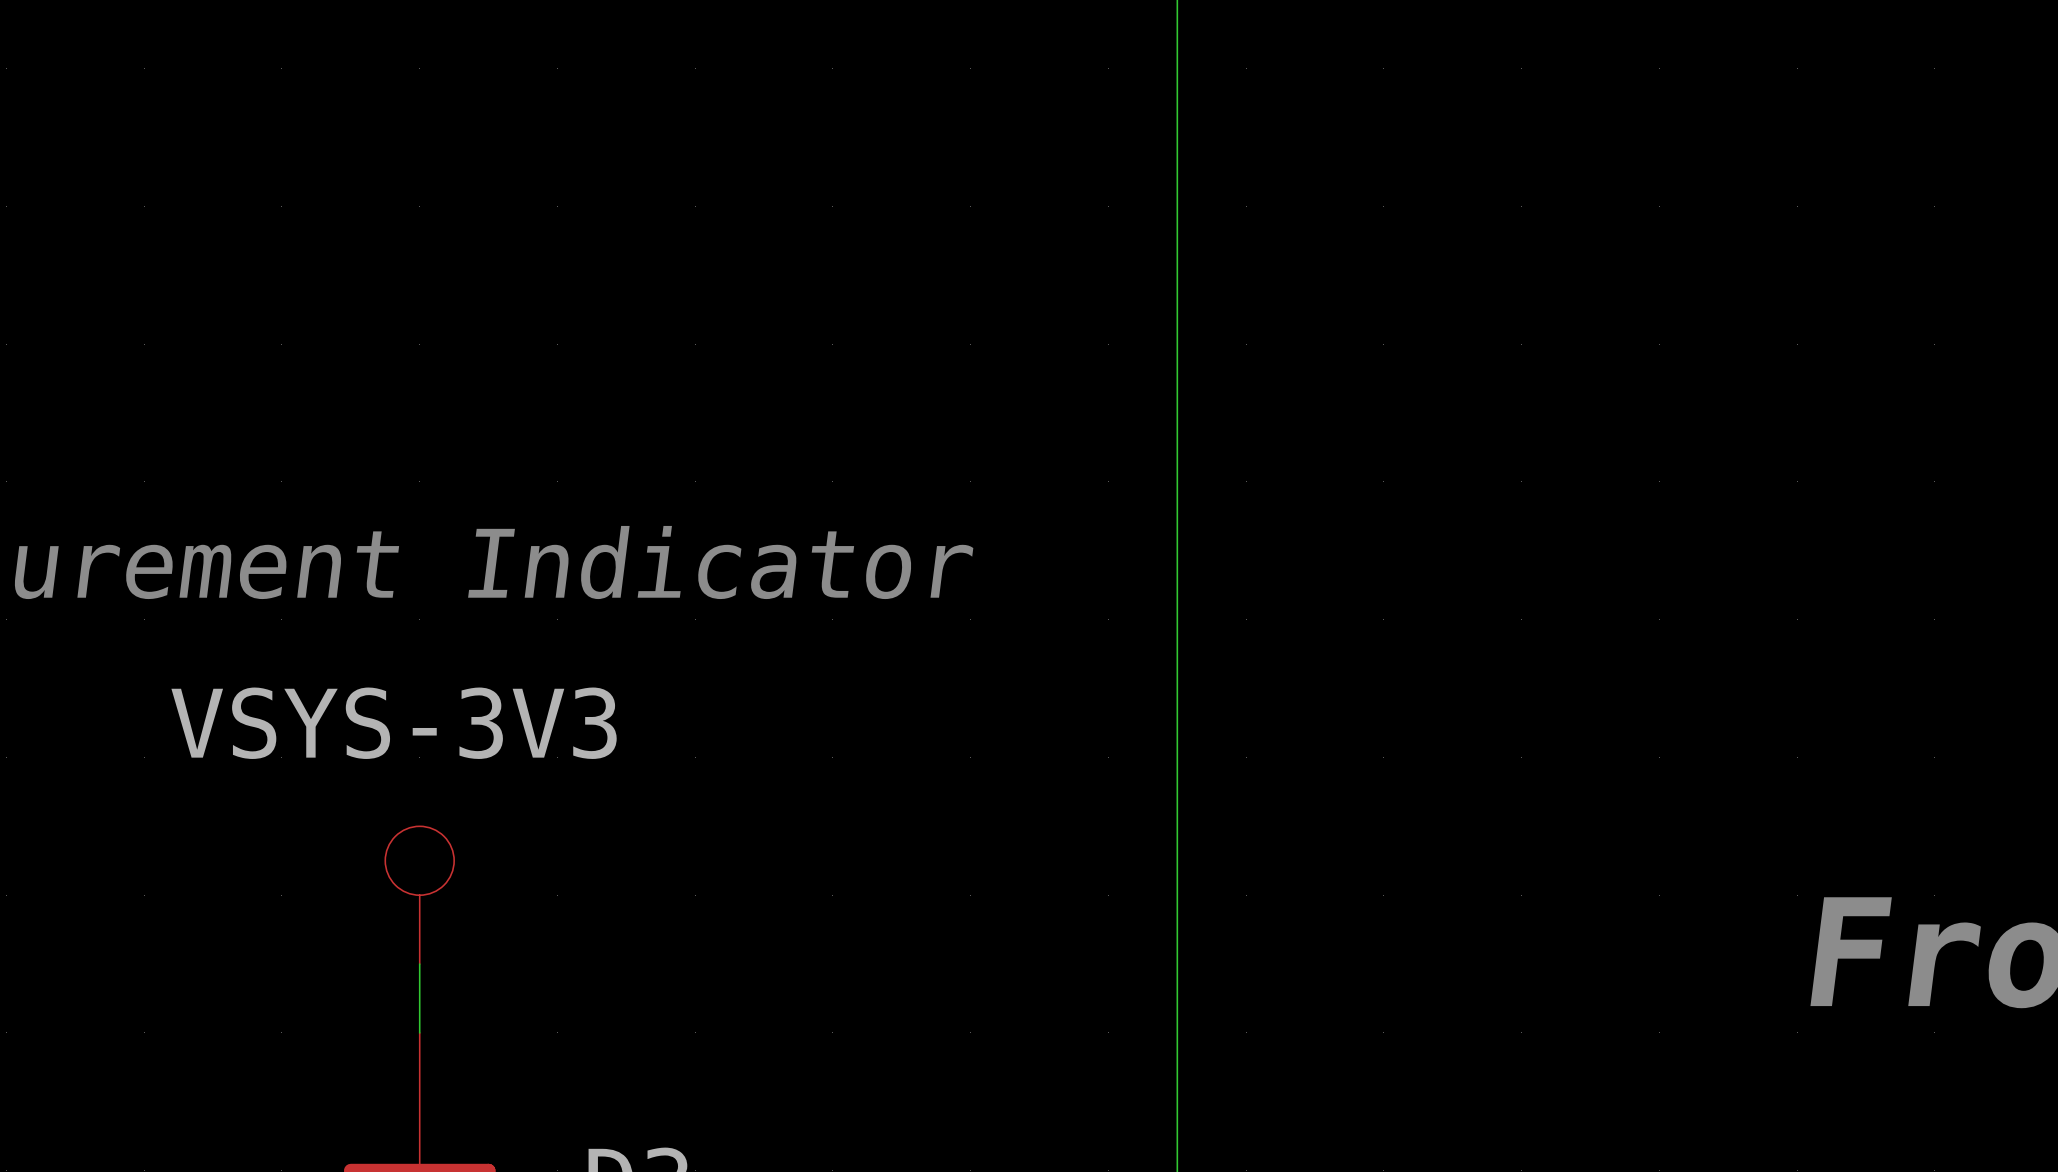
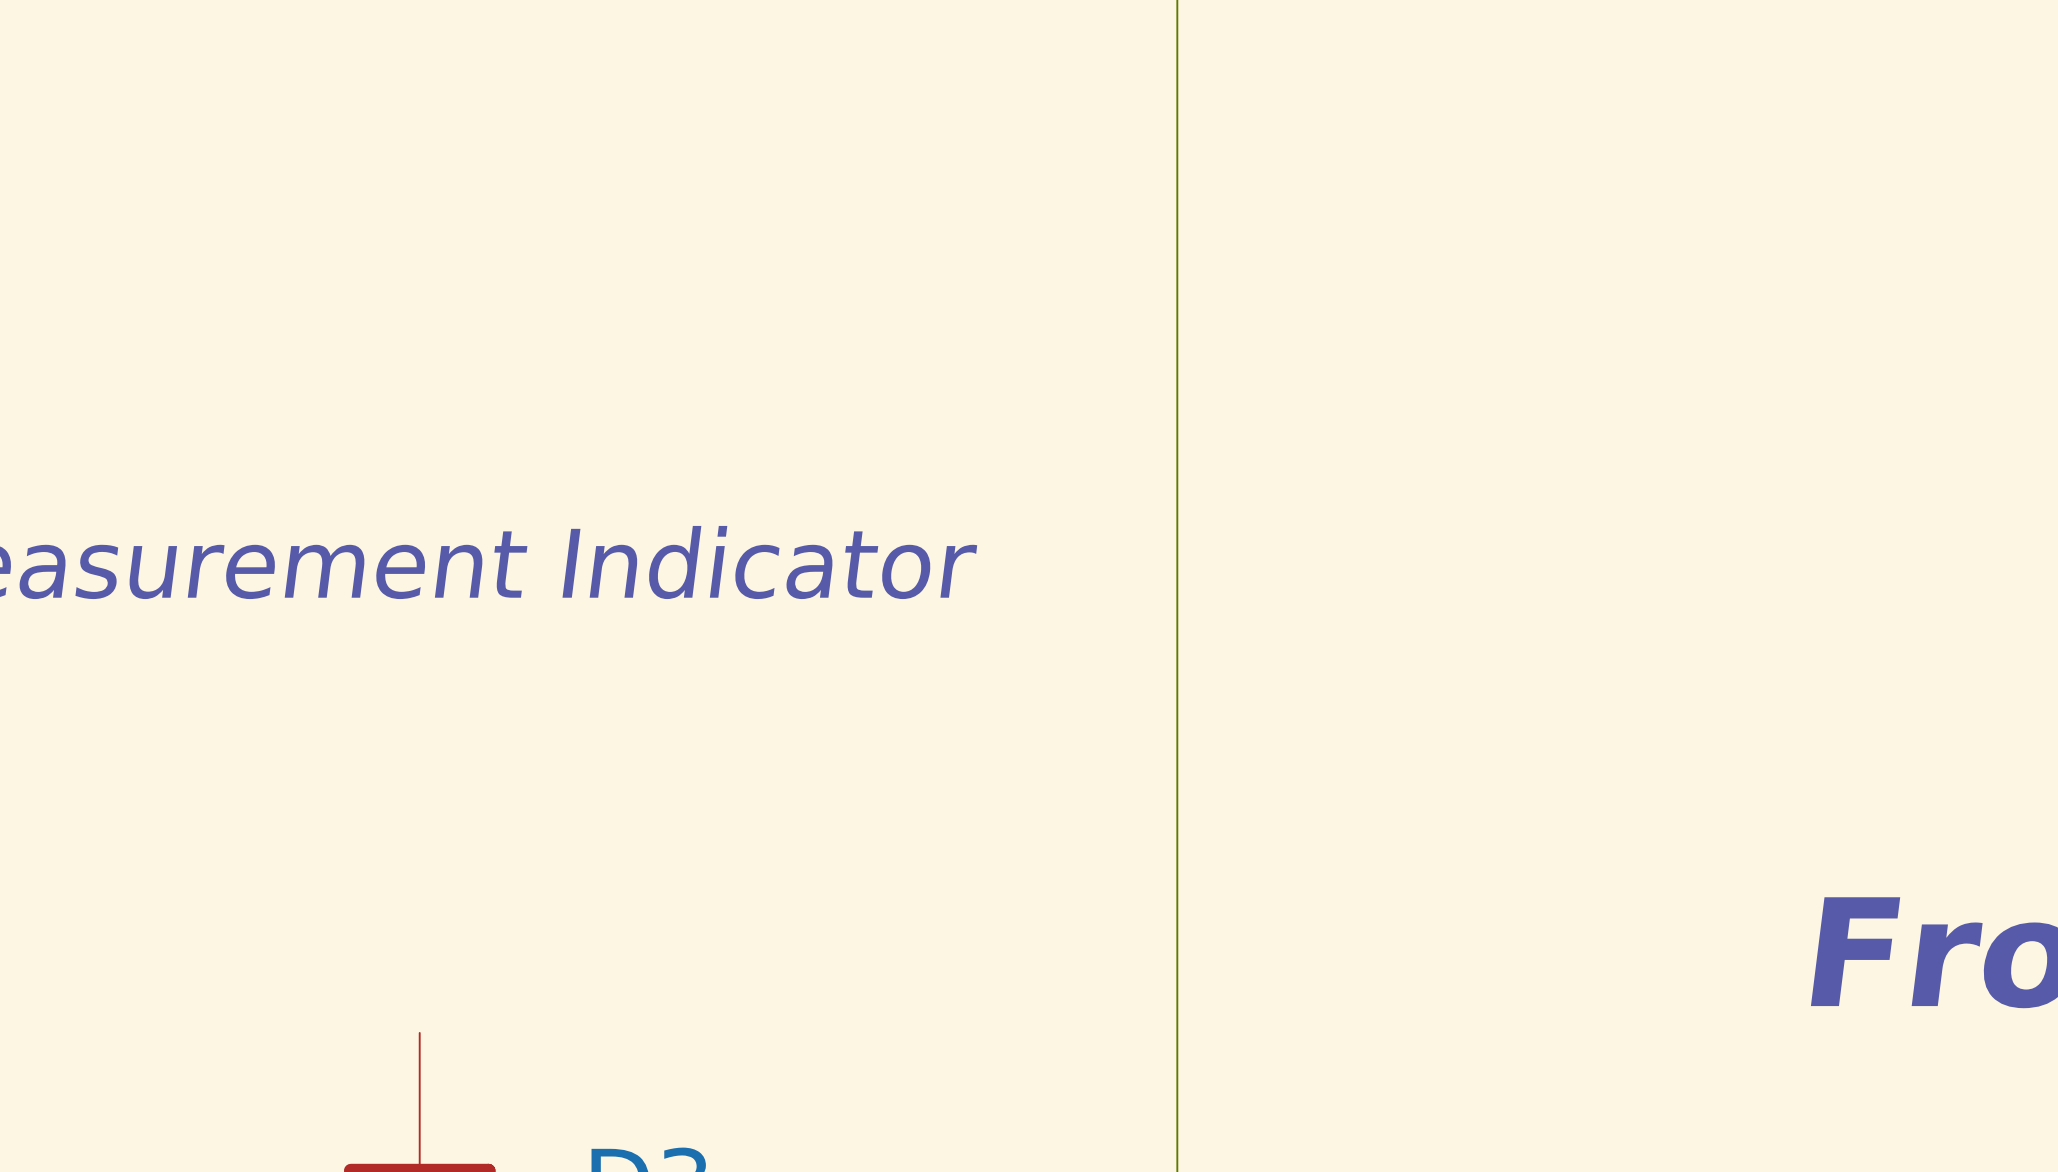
power symbol: VSYS-3V3 (419, 895) -> none
wire: (419, 964) (419, 1032) -> none

